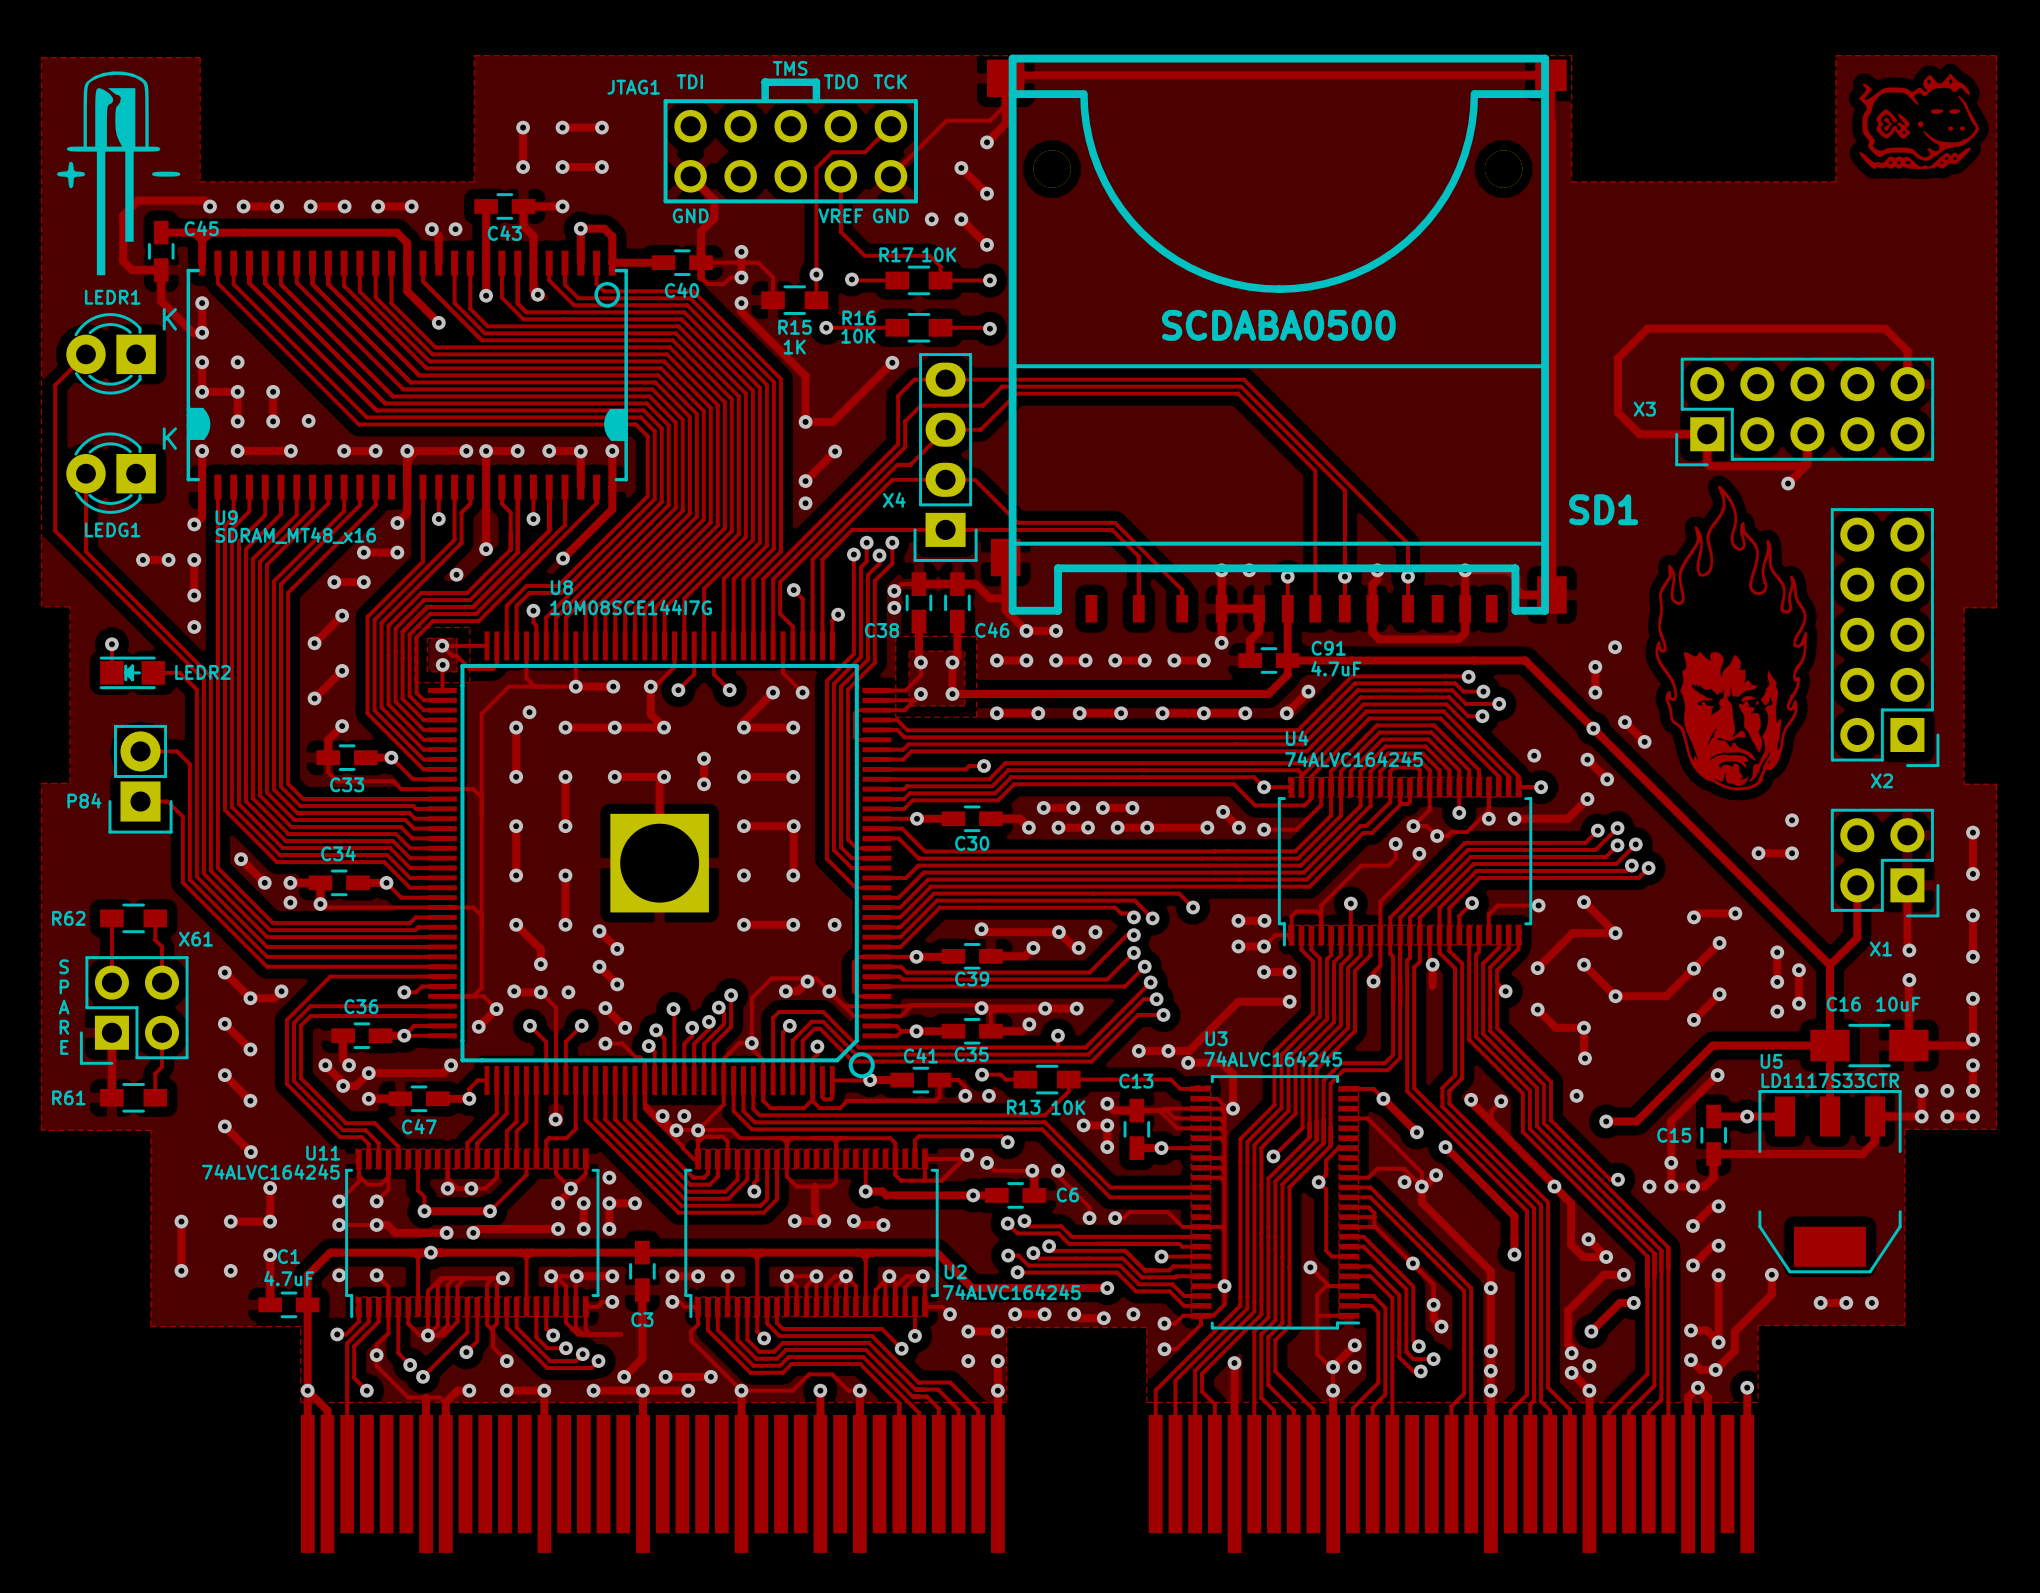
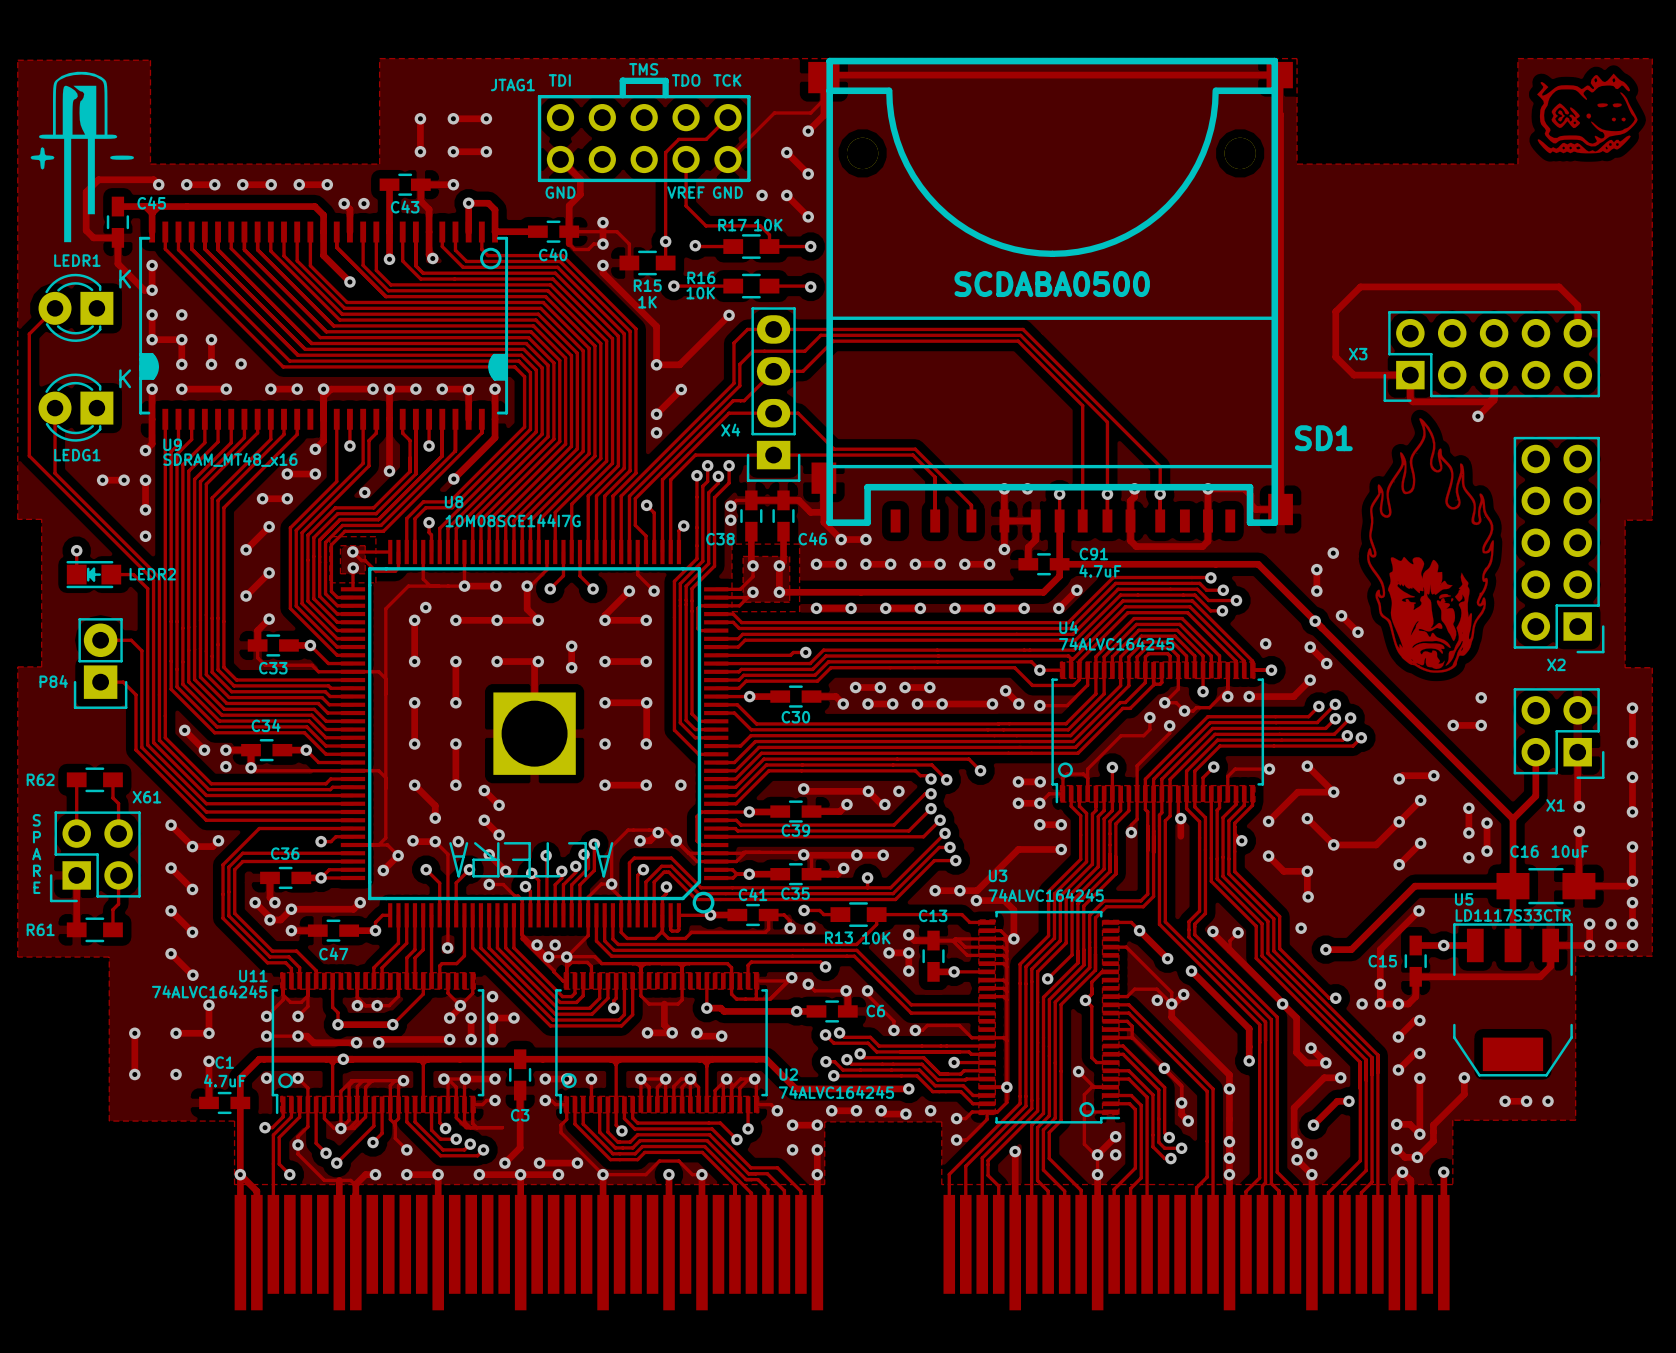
U8 footprint: [427, 631, 892, 1095] -> [340, 539, 729, 928]
U4 footprint: [1277, 777, 1533, 947] -> [1051, 661, 1265, 804]
U3 footprint: [1191, 1075, 1361, 1330] -> [978, 910, 1121, 1124]
U11 footprint: [345, 1149, 600, 1319] -> [271, 972, 485, 1115]
U2 footprint: [684, 1149, 939, 1319] -> [555, 972, 768, 1115]

